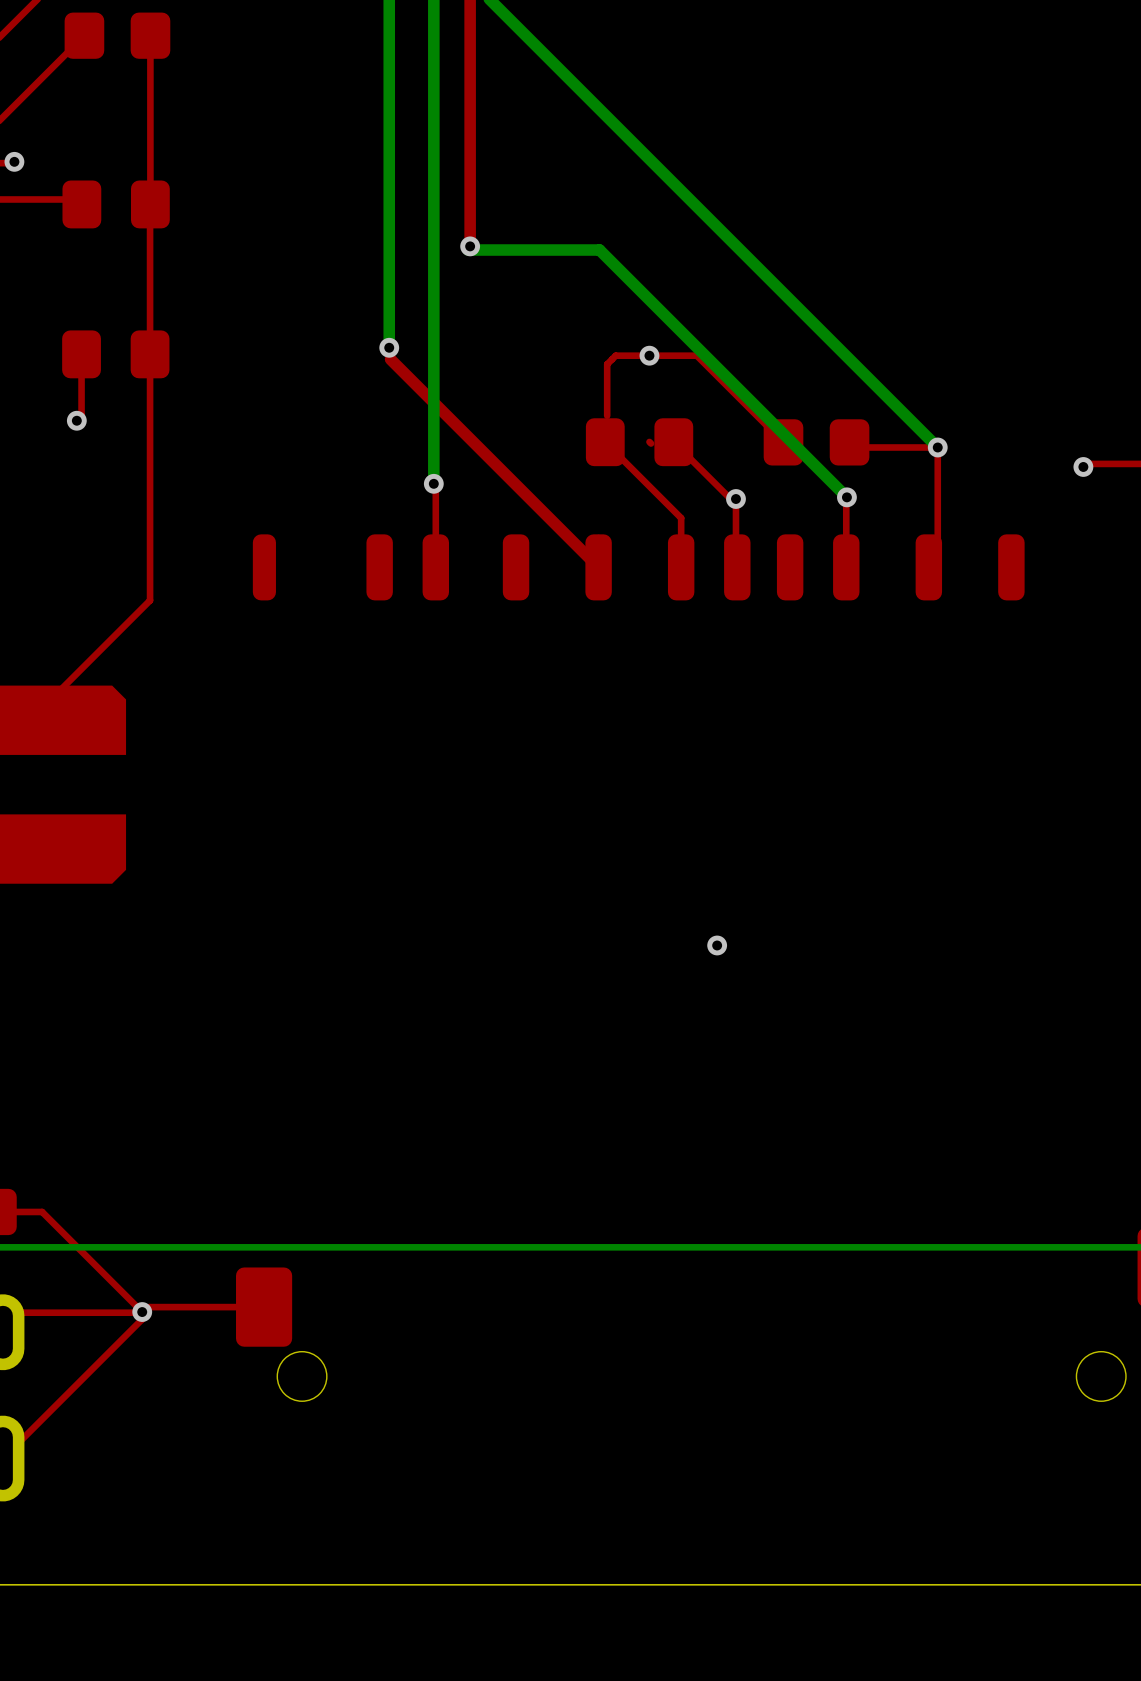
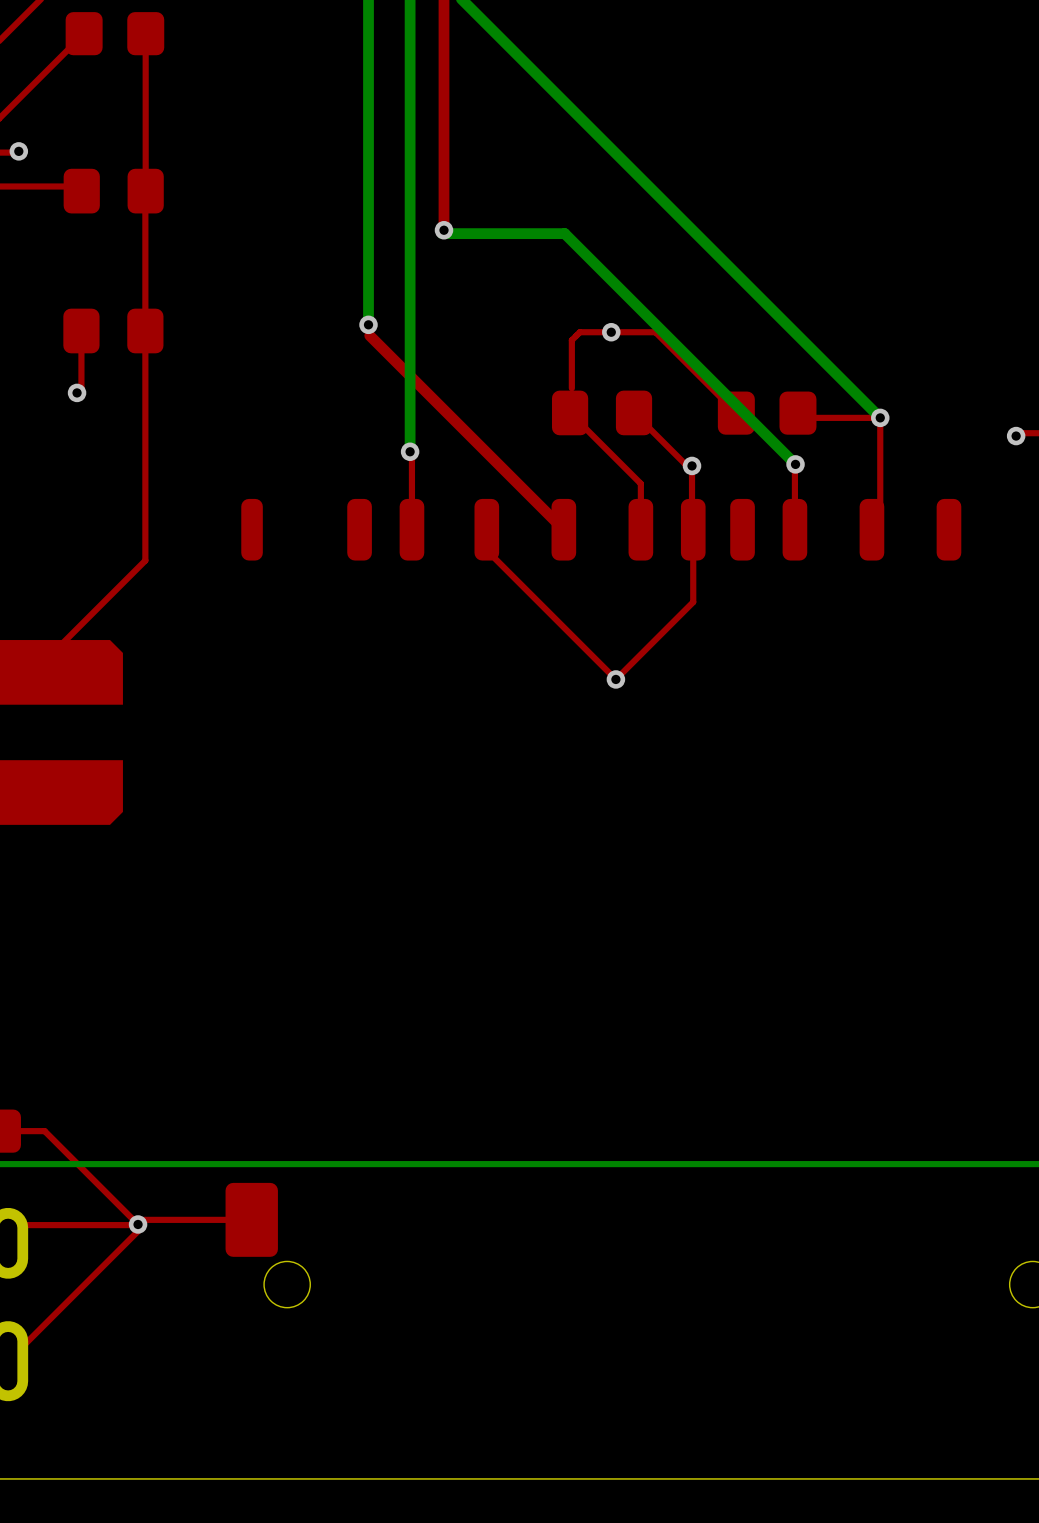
top track: (649, 441) (651, 443) -> none
top track: none -> (693, 529) (693, 602) (615, 679) (486, 550) (486, 529)
via: none -> (615, 679)
via: (717, 945) -> none

